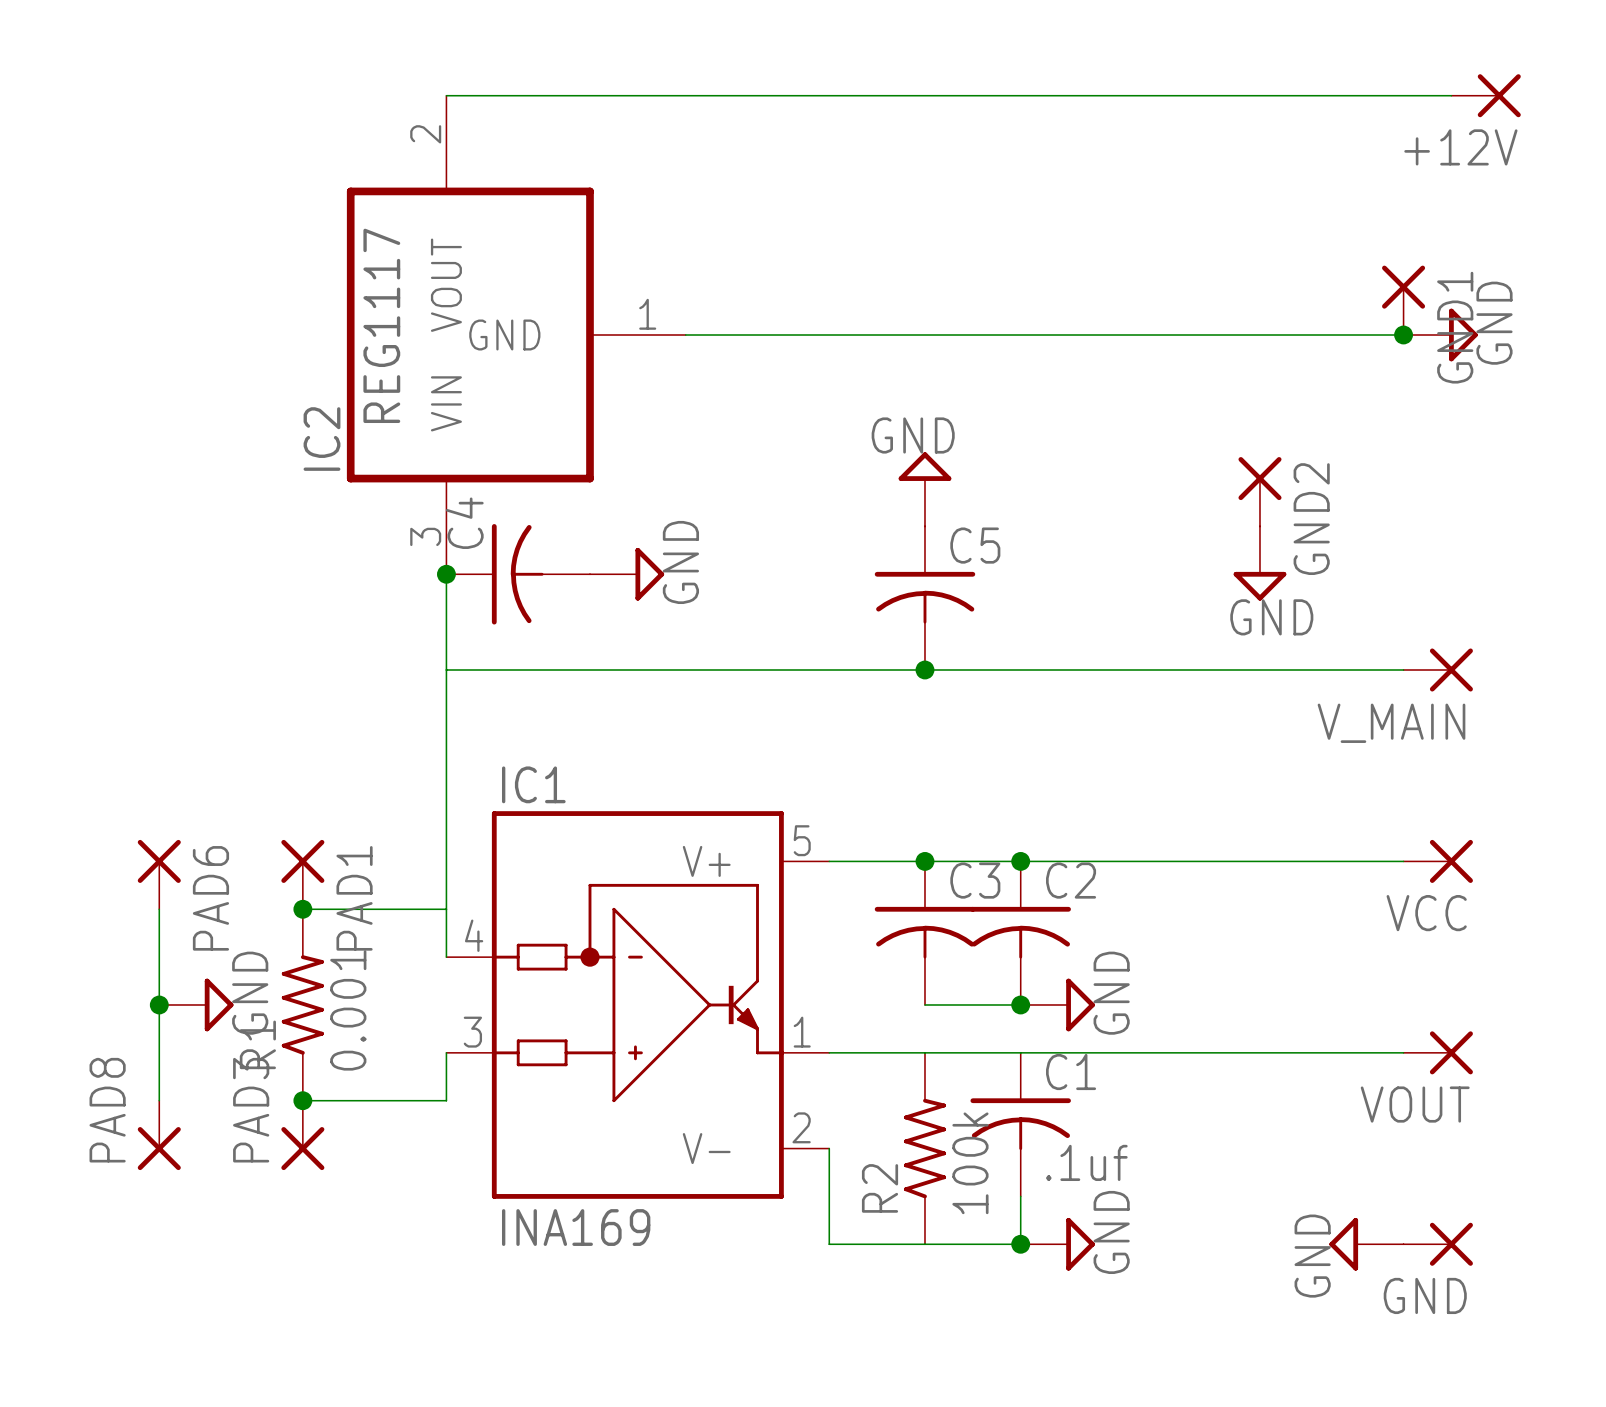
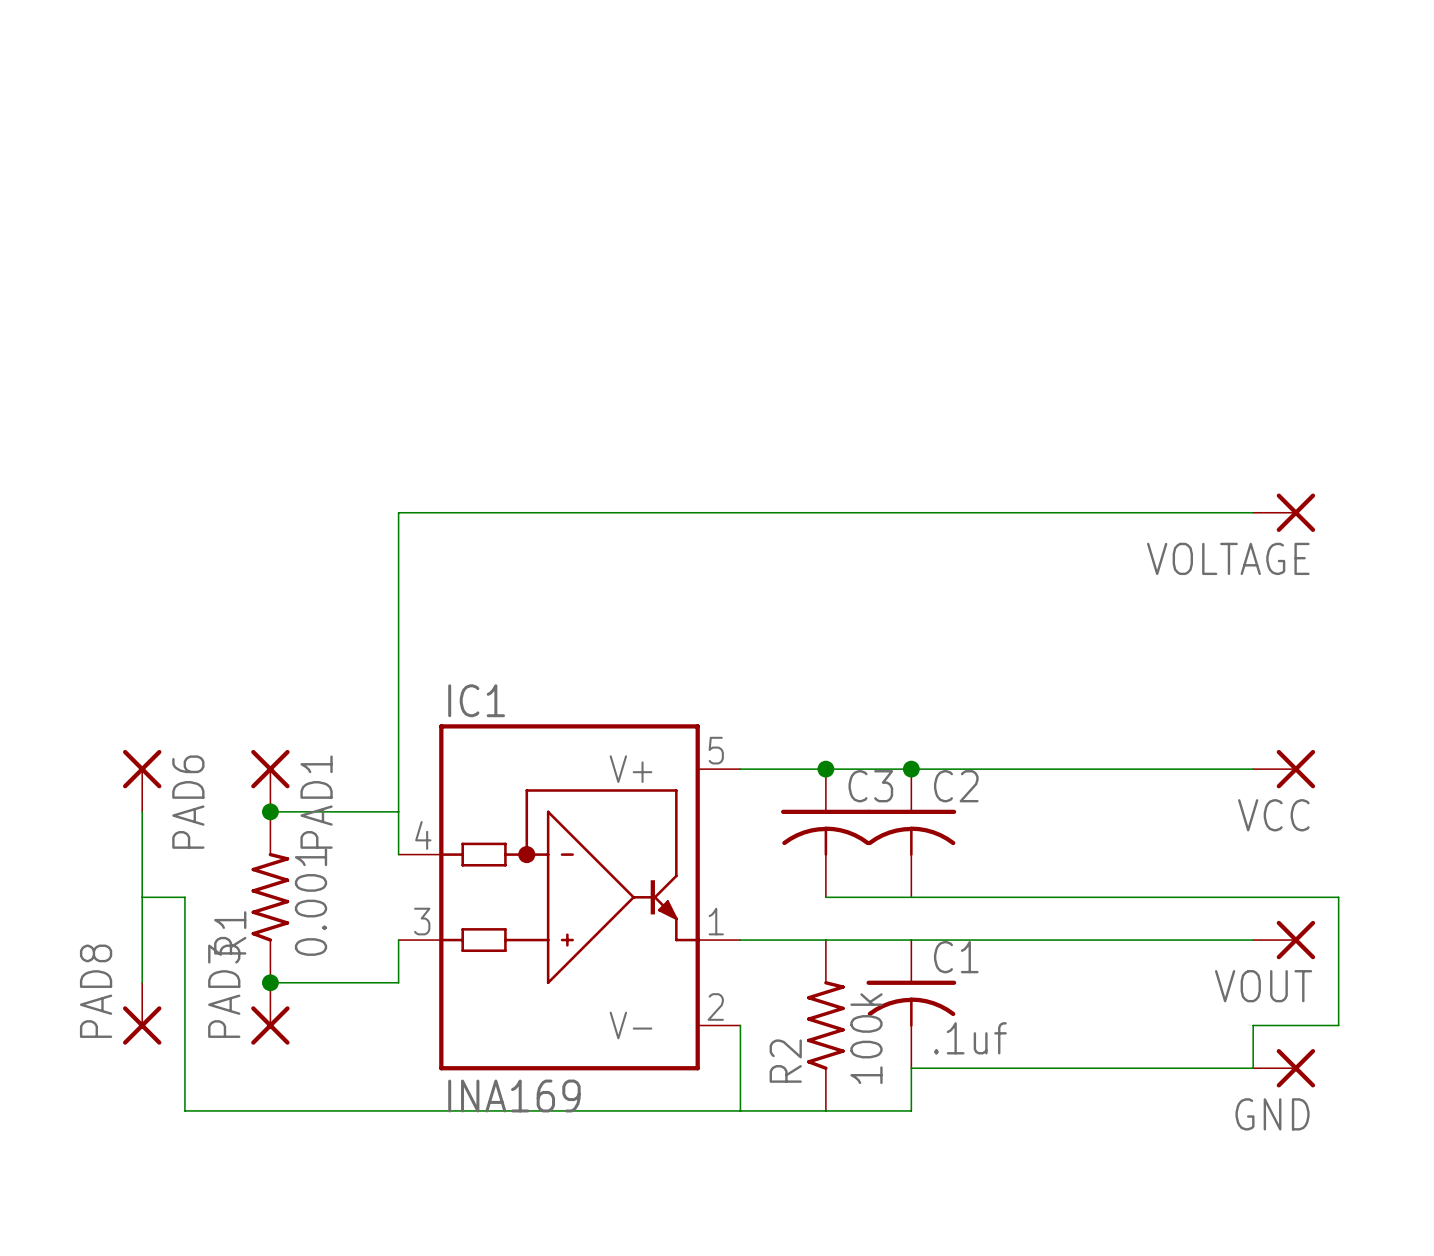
wire: (446, 95) (1451, 95) -> none
+12V: (1486, 95) -> none
GND1: (1403, 300) -> none
IC2: REG1117 (516, 335) -> none
wire: (685, 335) (1403, 335) -> none
junction: (1403, 335) -> none
power symbol: GND (1440, 335) -> none
power symbol: GND (924, 489) -> none
GND2: (1259, 491) -> none
power symbol: GND (1259, 563) -> none
junction: (446, 574) -> none
C4: (518, 574) -> none
power symbol: GND (627, 574) -> none
VOLTAGE: none -> (1284, 512)
C5: (924, 598) -> none
wire: (446, 669) (1403, 669) -> (398, 512) (1253, 512)
junction: (924, 669) -> none
V_MAIN: (1438, 669) -> none
wire: none -> (142, 897) (184, 897) (184, 1110) (740, 1110)
junction: (159, 1004) -> none
power symbol: GND (196, 1004) -> none
wire: none -> (911, 897) (1338, 897) (1338, 1025) (1253, 1025) (1253, 1068) (911, 1068)
junction: (1020, 1004) -> none
power symbol: GND (1057, 1004) -> none
junction: (1020, 1244) -> none
power symbol: GND (1057, 1244) -> none
power symbol: GND (1366, 1244) -> none
GND position: (1438, 1244) -> (1284, 1068)

